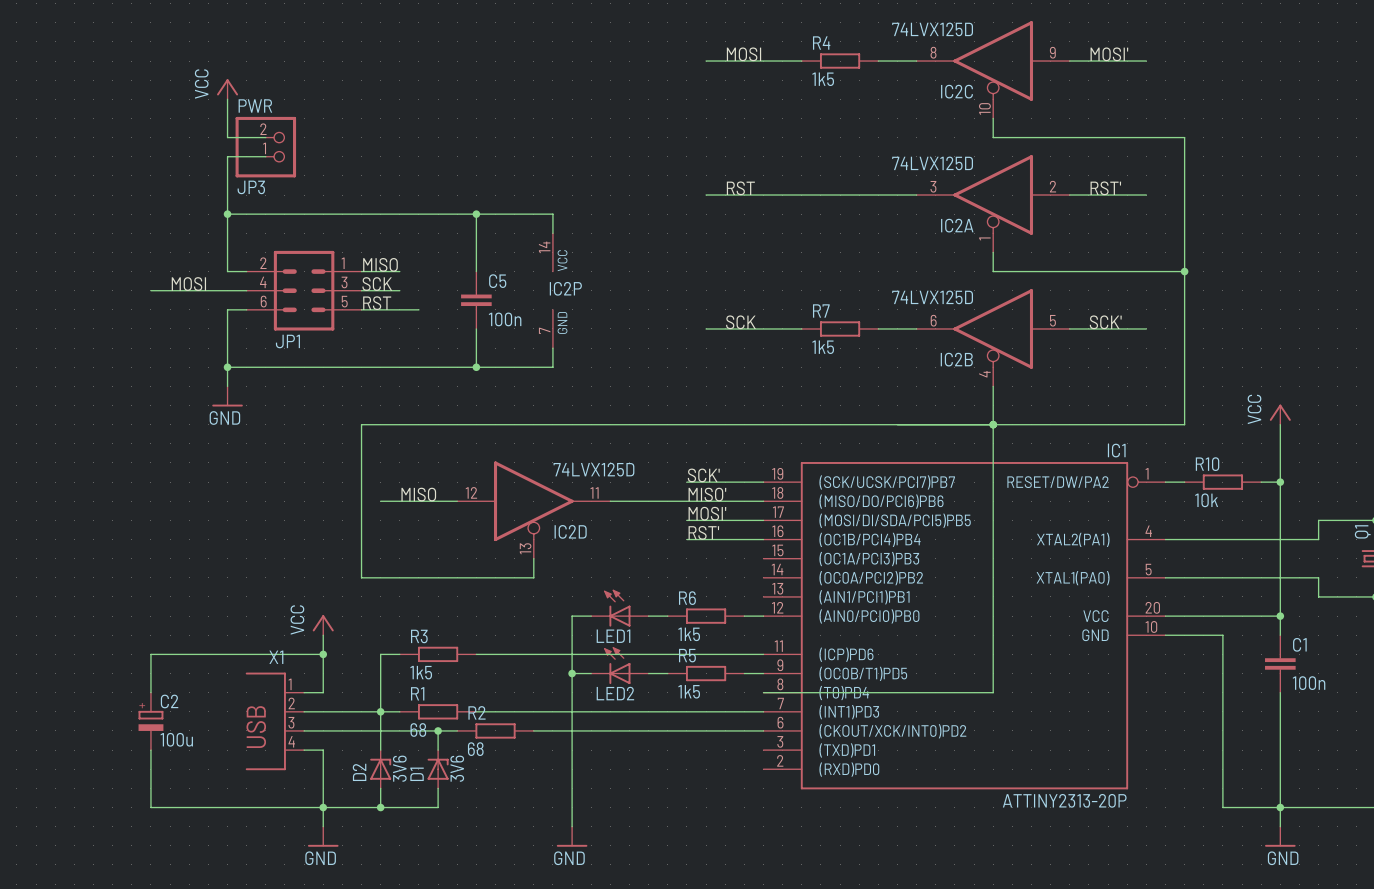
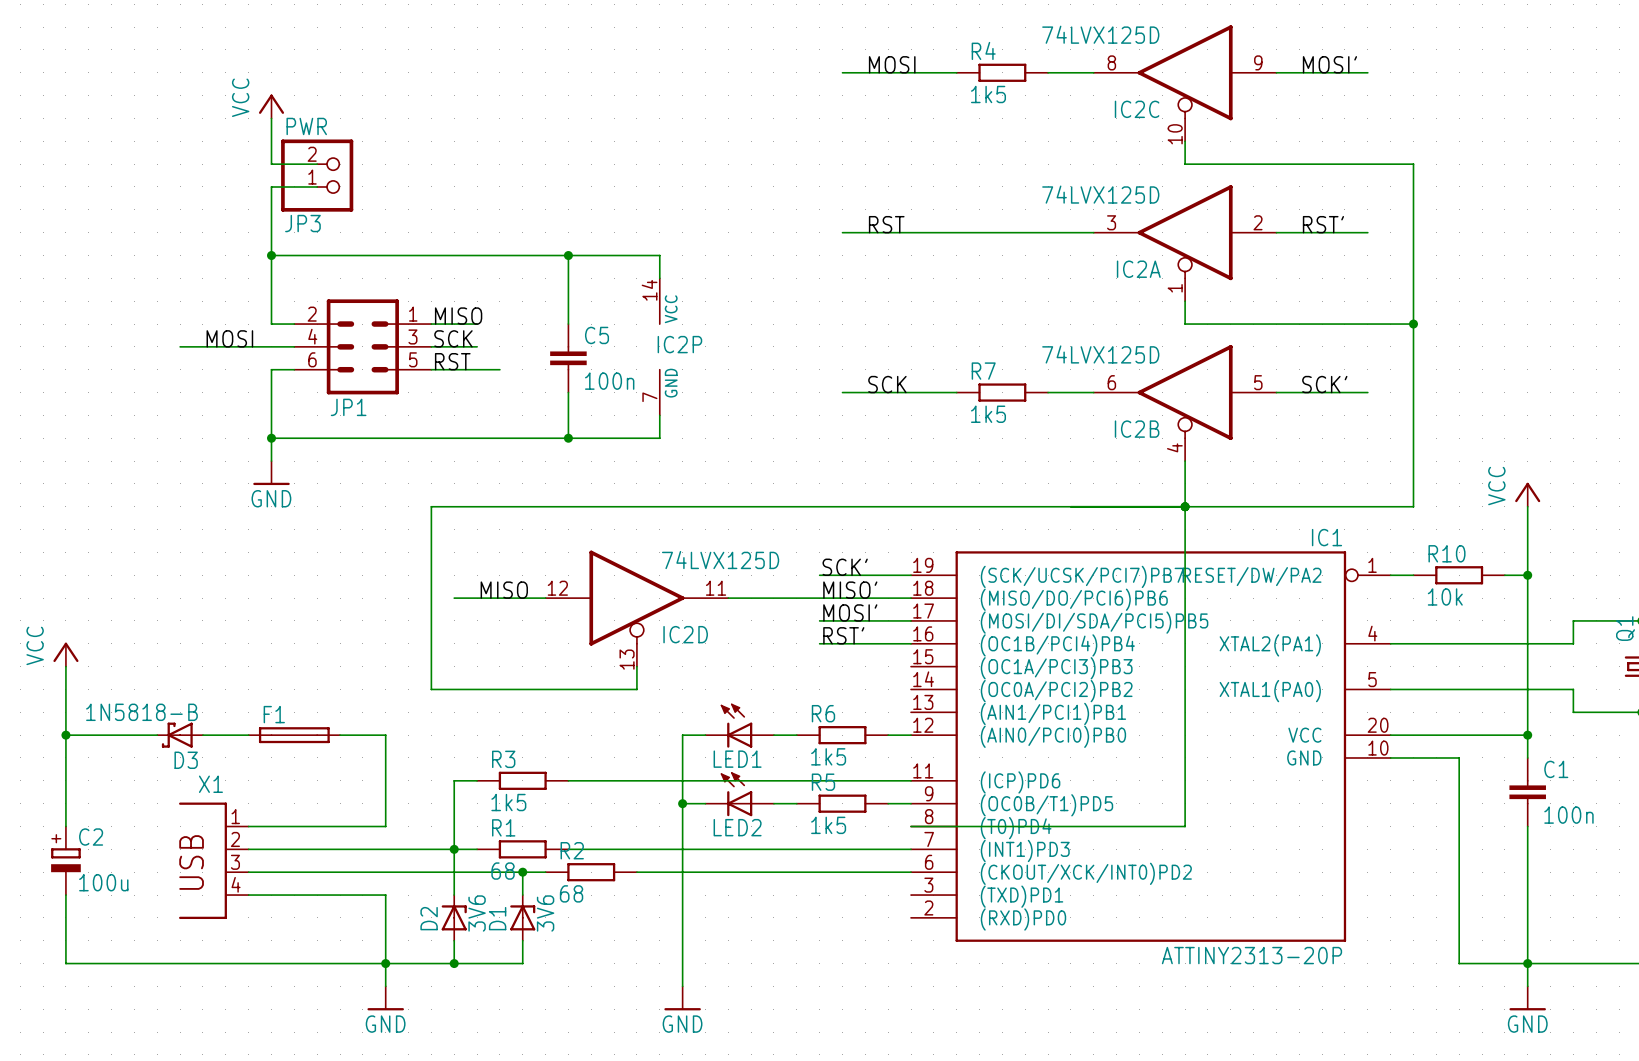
power symbol: none -> VCC (65, 654)
wire: none -> (65, 666) (65, 826)
wire: none -> (65, 735) (157, 735)
junction: none -> (65, 735)
D3: none -> 1N5818-B (180, 735)
wire: none -> (202, 735) (248, 735)
F1: none -> (294, 735)
wire: none -> (340, 735) (385, 735) (385, 757)
power symbol: VCC (323, 625) -> none
wire: (323, 654) (150, 654) (150, 692) -> none
junction: (323, 654) -> none
wire: none -> (248, 826) (362, 826)
wire: none -> (248, 849) (362, 849)
C2 position: (150, 721) -> (65, 860)
X1 position: (274, 721) -> (213, 860)
wire: none -> (248, 872) (362, 872)
wire: (150, 750) (150, 807) -> (65, 895) (65, 963) (180, 963)
wire: none -> (248, 895) (362, 895)

